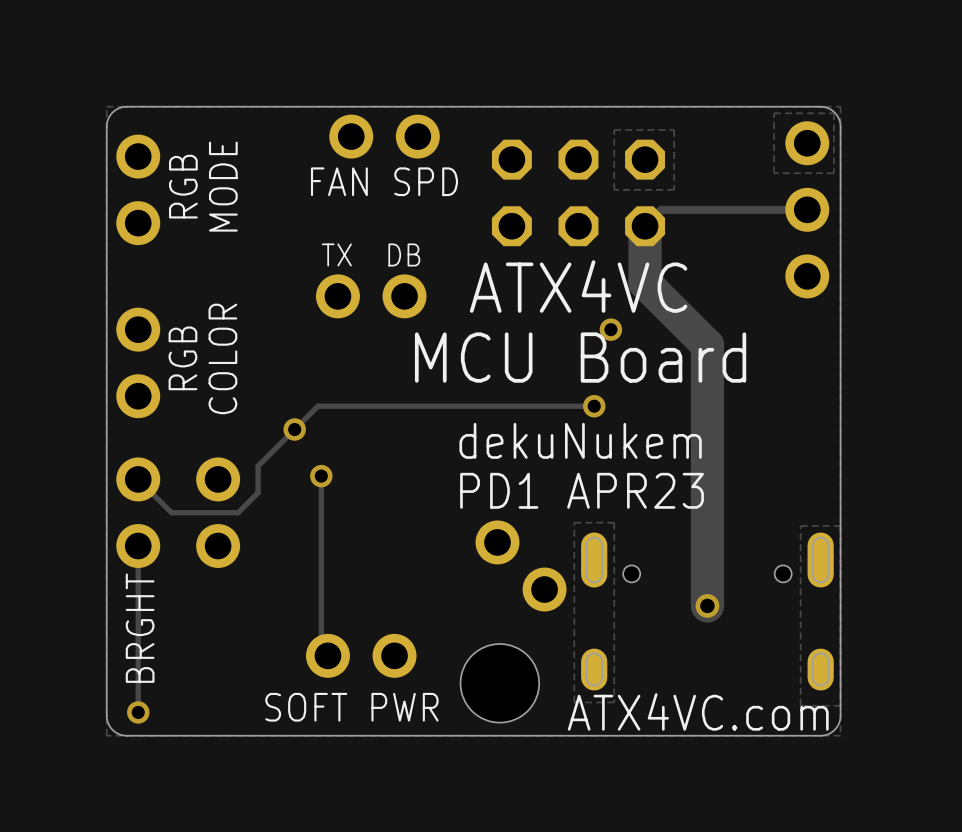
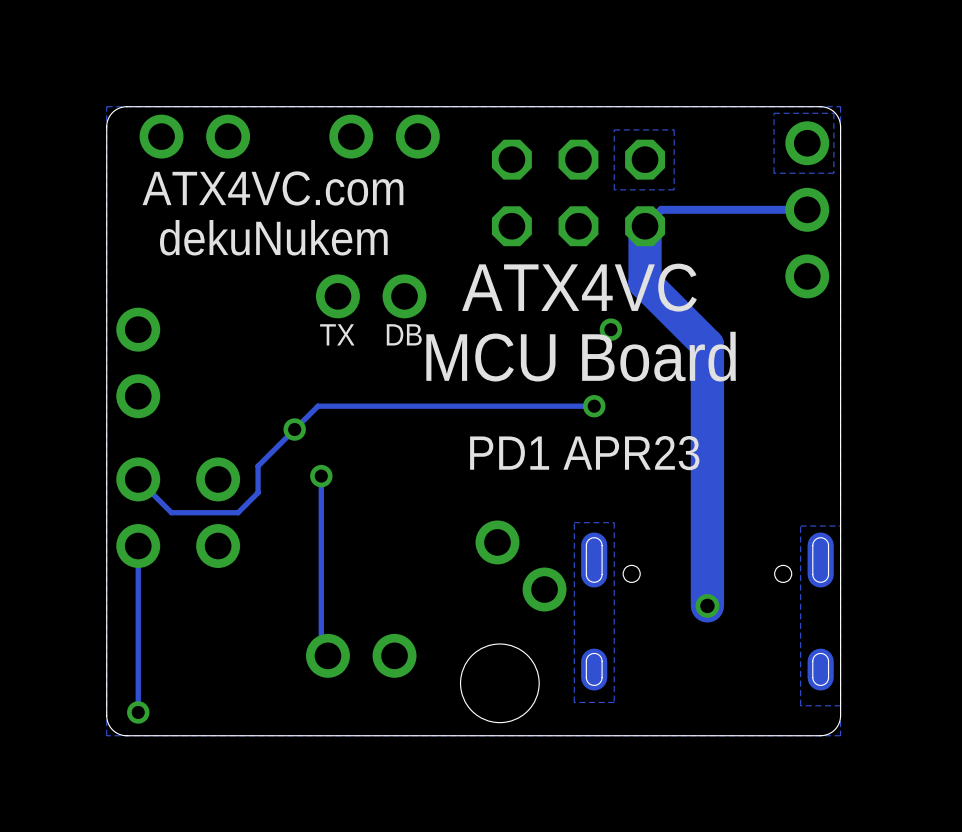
text: FAN SPD (384, 181) -> none
text: RGB (183, 186) -> none
text: MODE (223, 186) -> none
text: none -> ATX4VC.com (272, 188)
part rotation: 0° (138, 189) -> 90° clockwise (194, 136)
part position: (138, 189) -> (194, 136)
text position: TX (336, 254) -> TX (337, 334)
text position: DB (404, 254) -> DB (404, 334)
text: RGB (182, 358) -> none
text: COLOR (222, 358) -> none
text position: dekuNukem (580, 440) -> dekuNukem (273, 237)
text position: PD1 APR23 (582, 490) -> PD1 APR23 (584, 453)
text: BRGHT (140, 628) -> none
text: SOFT PWR (351, 707) -> none
text: ATX4VC.com (698, 711) -> none

